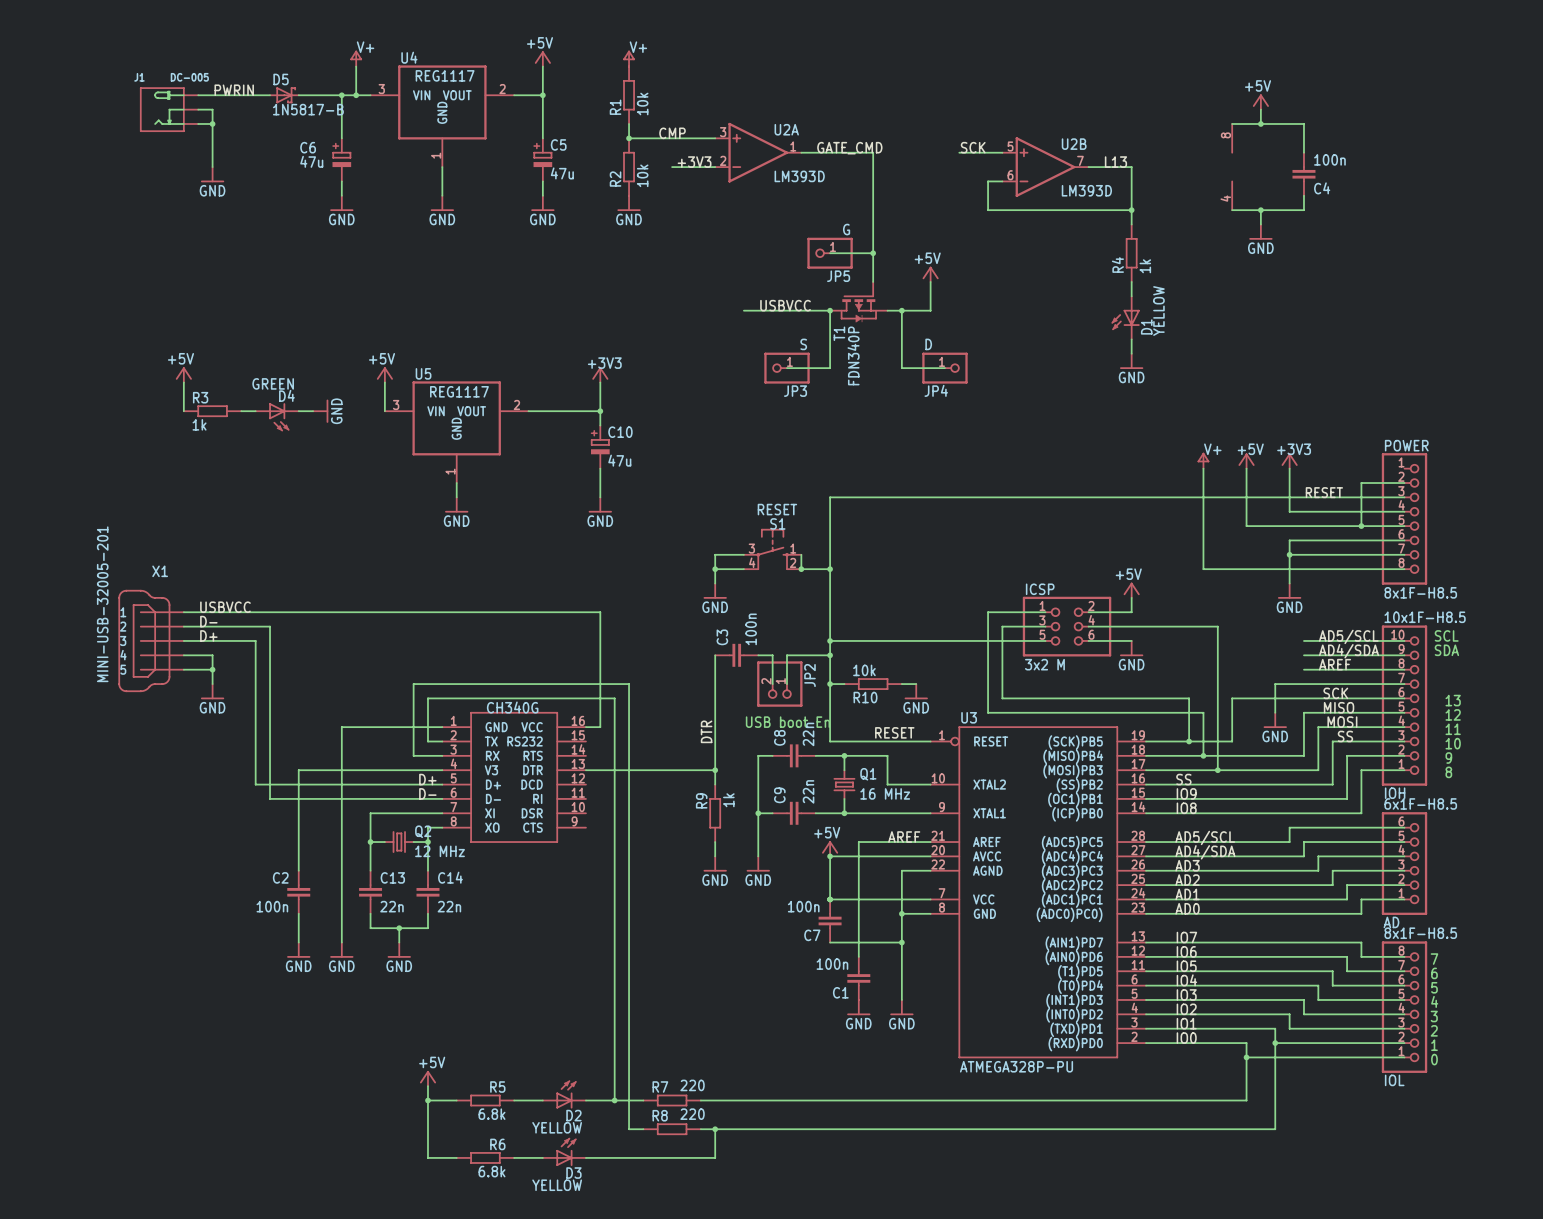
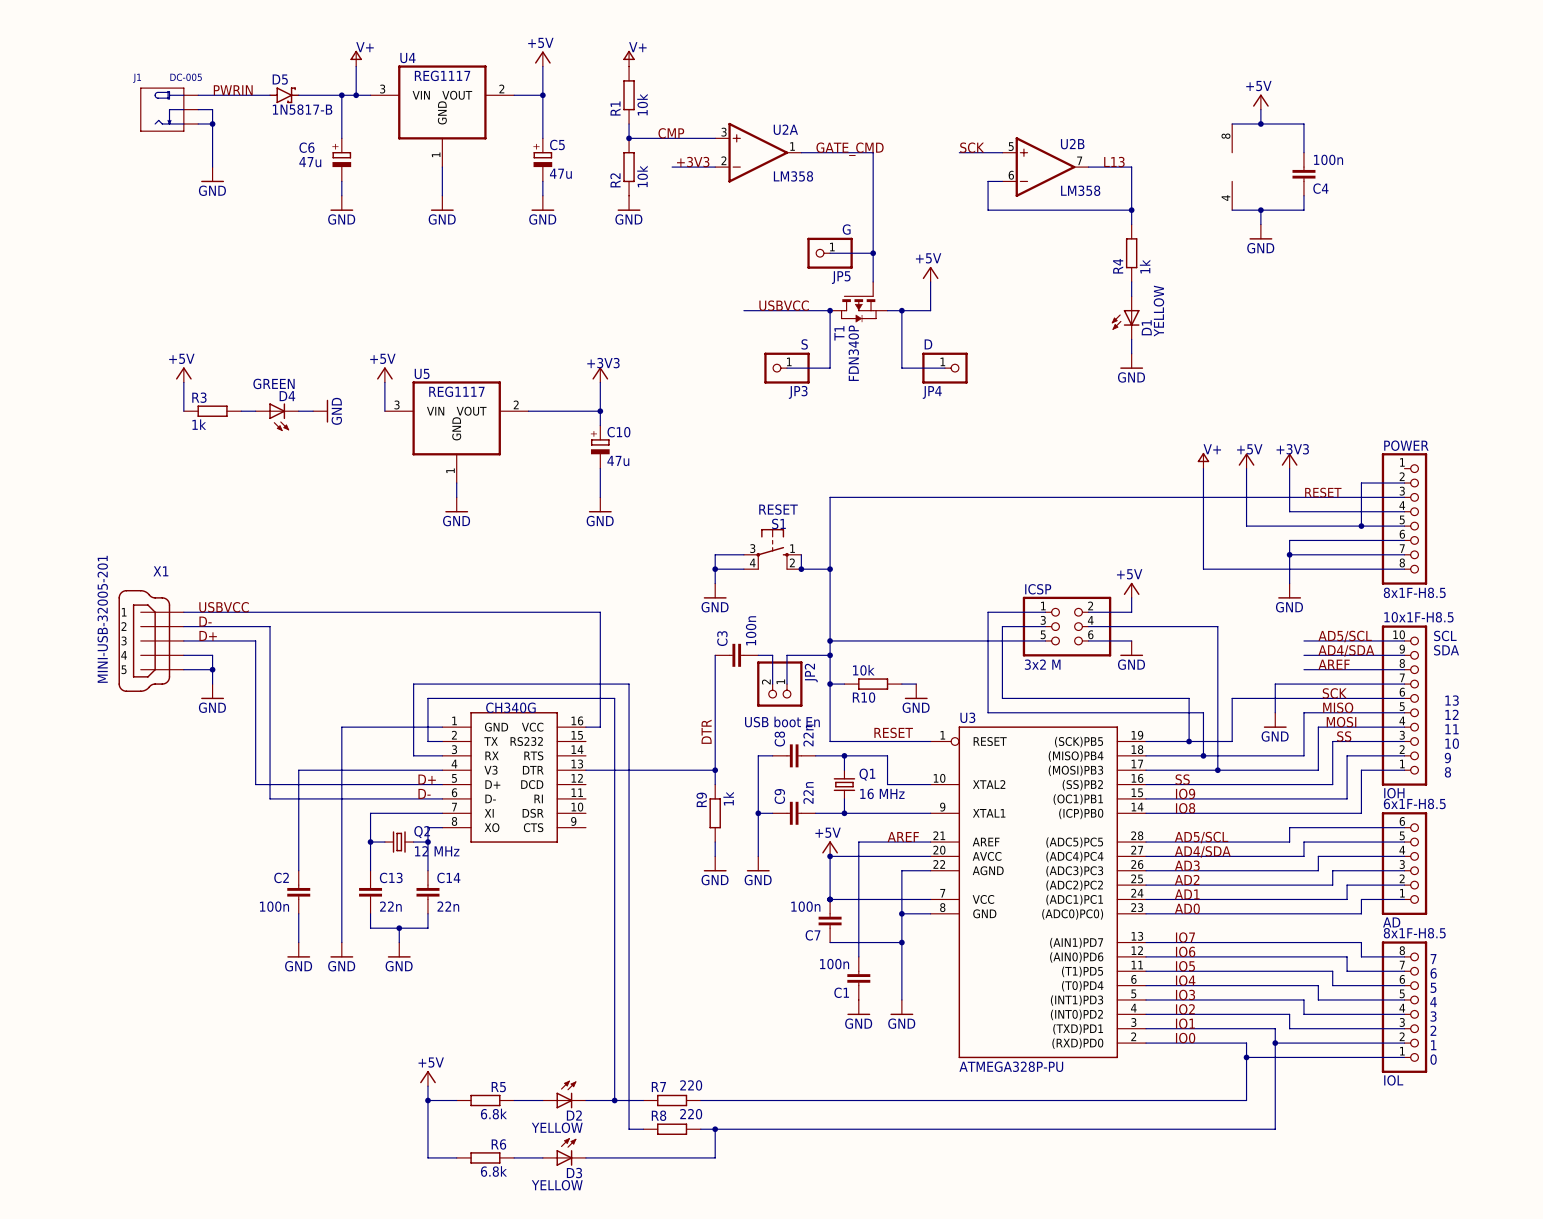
D5 symbol: [270, 87, 299, 104] -> [269, 87, 300, 104]
U2A value: LM393D (799, 176) -> LM358 (793, 176)
U2B value: LM393D (1086, 190) -> LM358 (1080, 190)

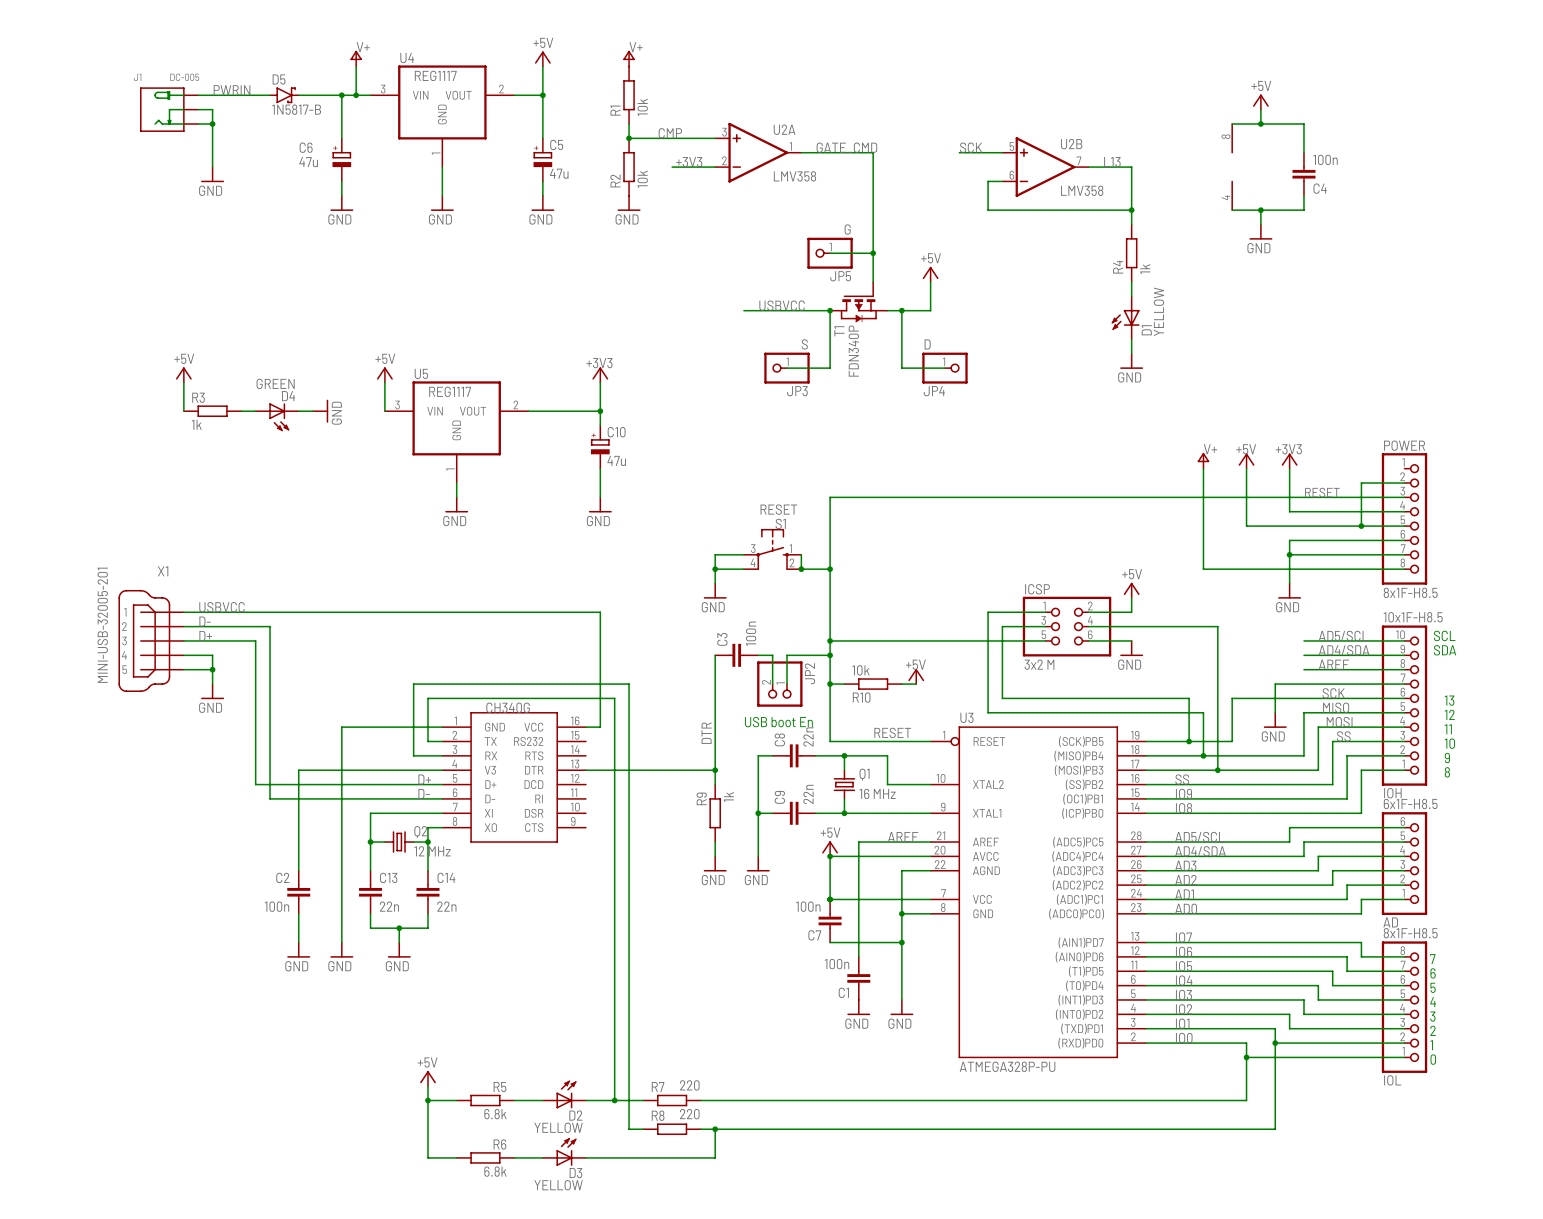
U2A value: LM358 (793, 176) -> LMV358 (794, 176)
U2B value: LM358 (1080, 190) -> LMV358 (1082, 190)
power symbol: none -> +5V (916, 676)
power symbol: GND (916, 691) -> none

